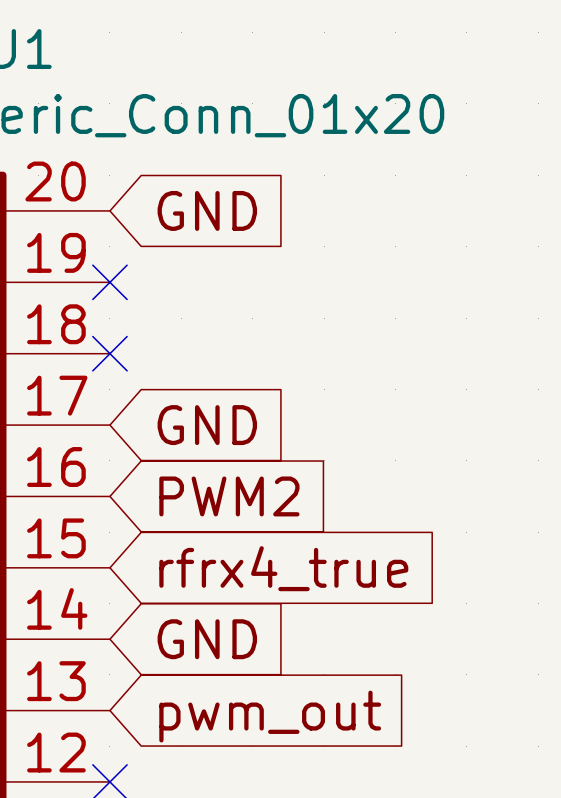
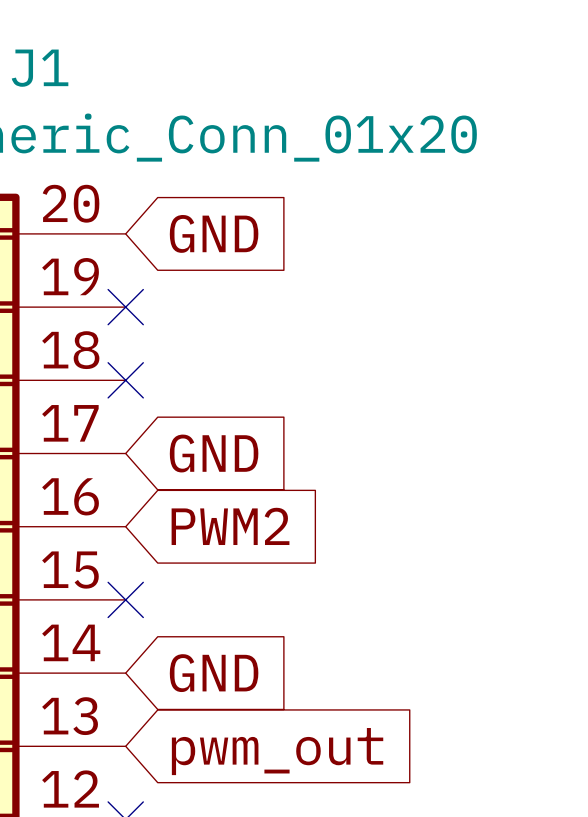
no-connect mark: none -> (125, 599)
global label: rfrx4_true (283, 568) -> none

